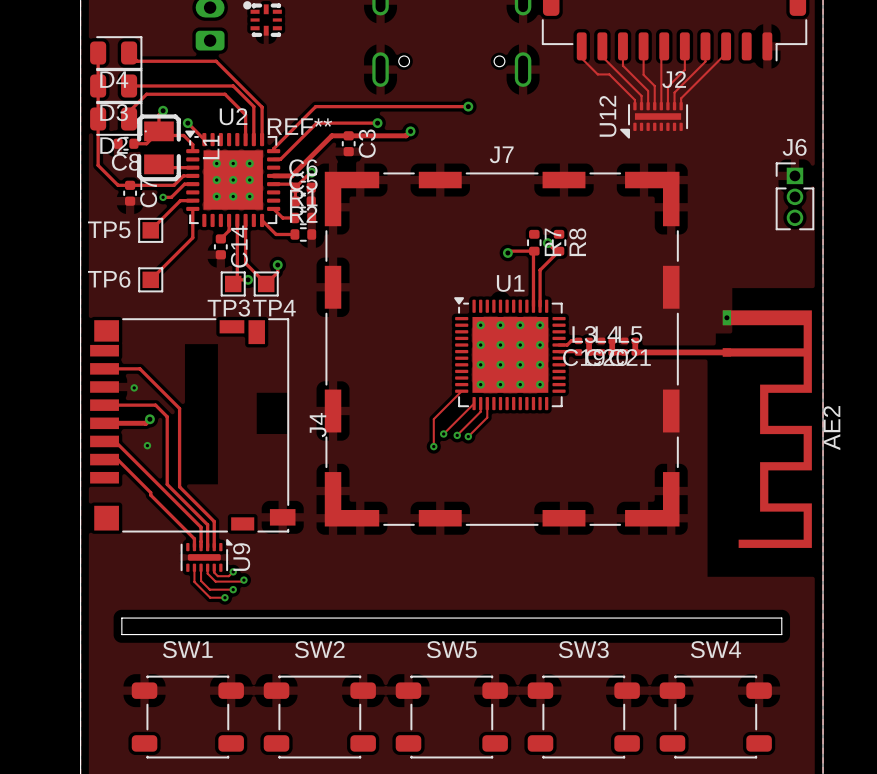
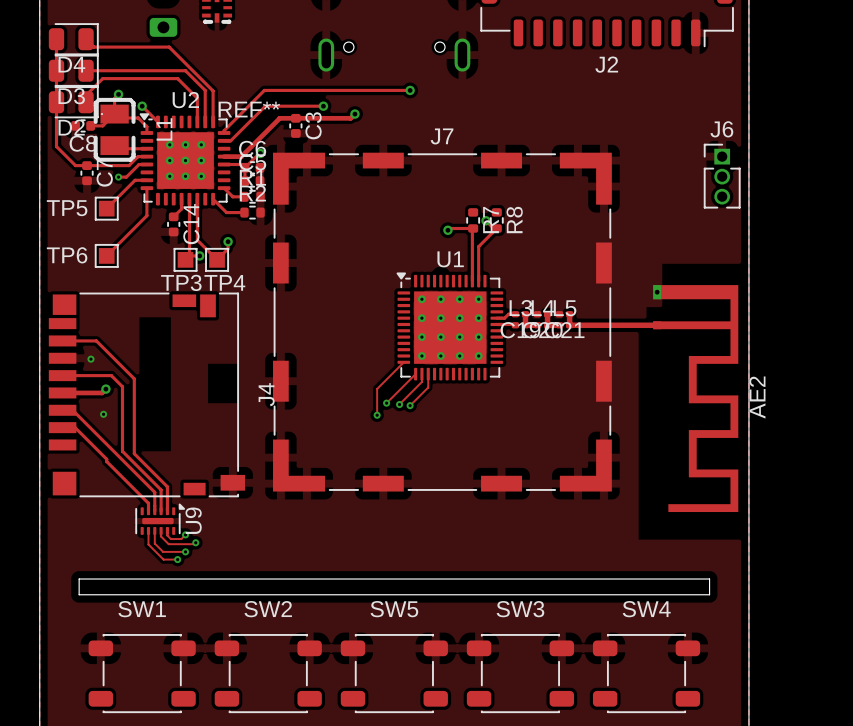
track: (581, 46) (581, 58) (597, 74) (609, 74) (634, 100) (634, 106) -> none
track: (602, 46) (602, 56) (641, 95) (641, 106) -> none
track: (622, 46) (622, 65) (648, 90) (648, 106) -> none
track: (643, 46) (643, 74) (654, 85) (654, 106) -> none
track: (664, 46) (661, 49) (661, 106) -> none
track: (684, 46) (684, 69) (667, 86) (667, 106) -> none
track: (705, 46) (705, 61) (674, 92) (674, 106) -> none
track: (726, 46) (726, 53) (681, 98) (681, 106) -> none
U12: (654, 120) -> none

